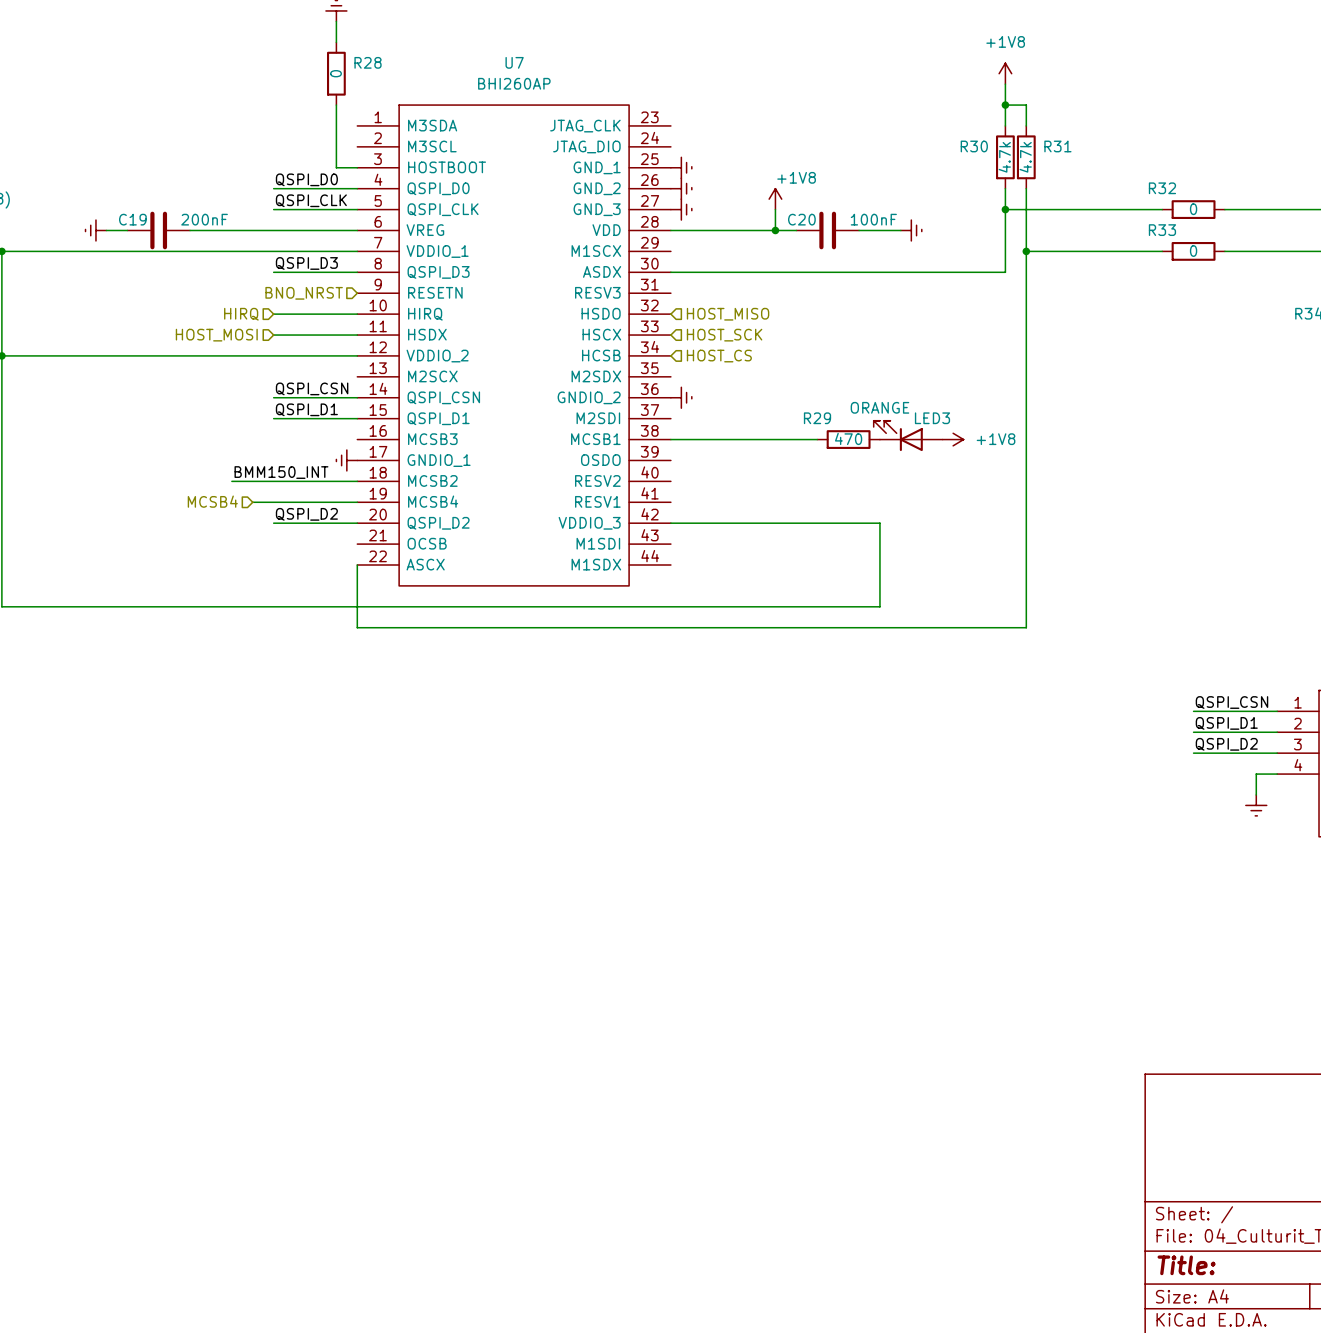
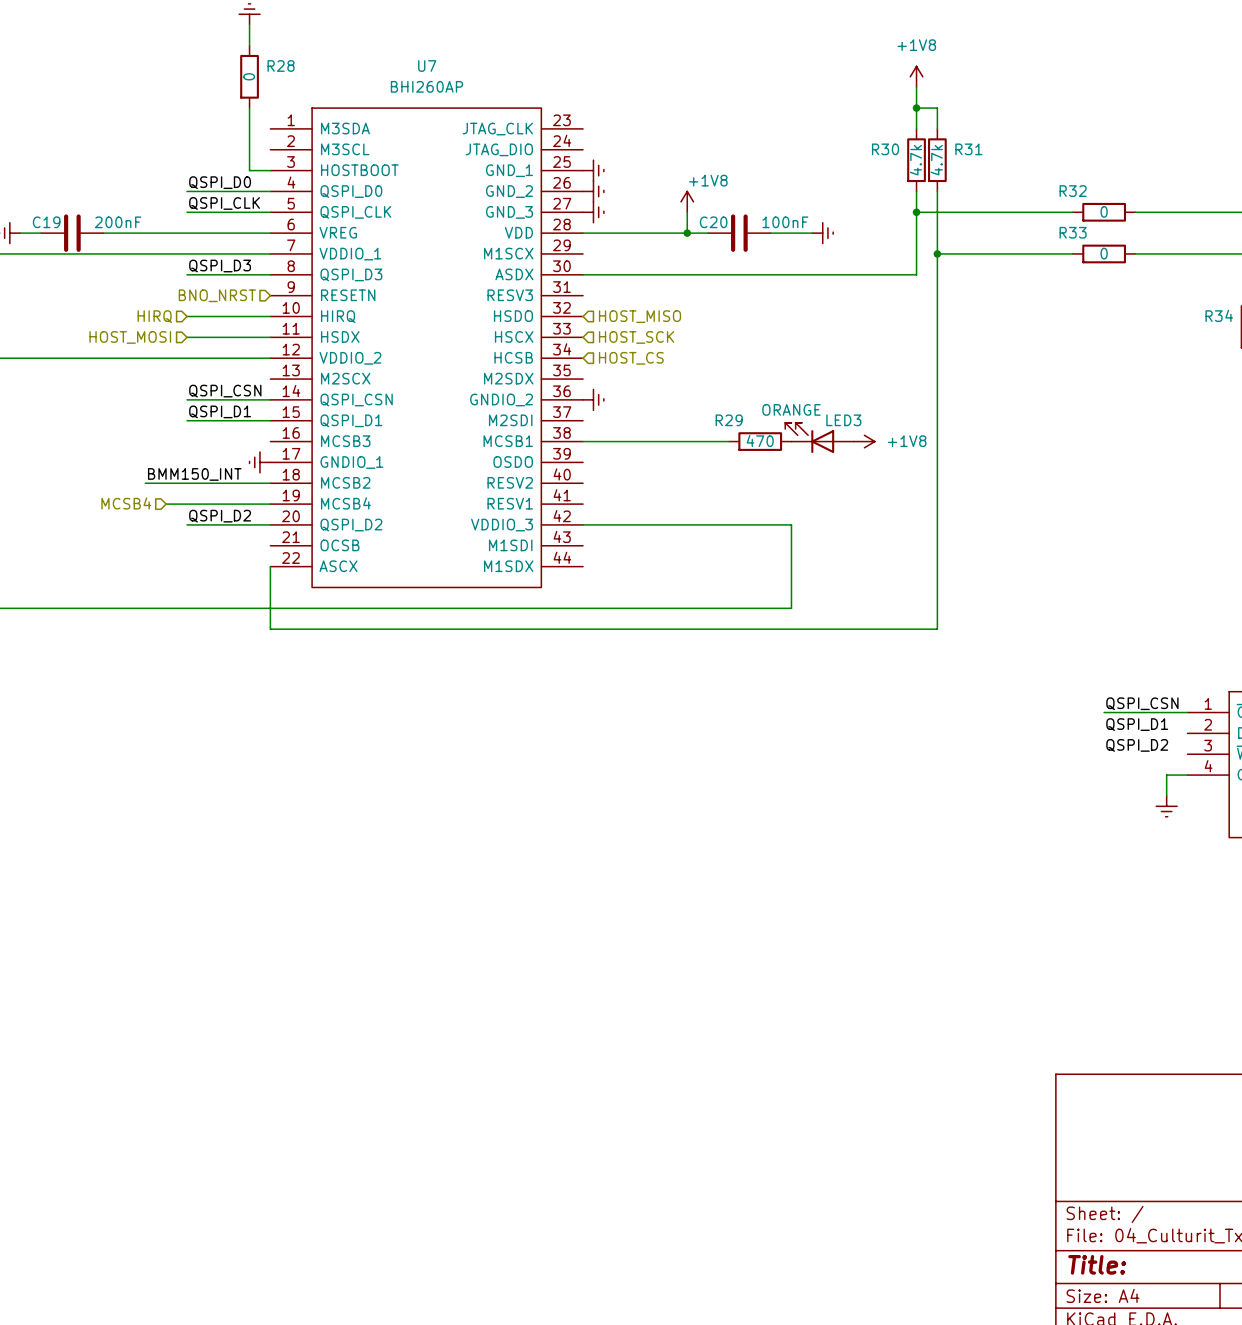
wire: (1193, 732) (1277, 732) -> none
wire: (1193, 753) (1277, 753) -> none

